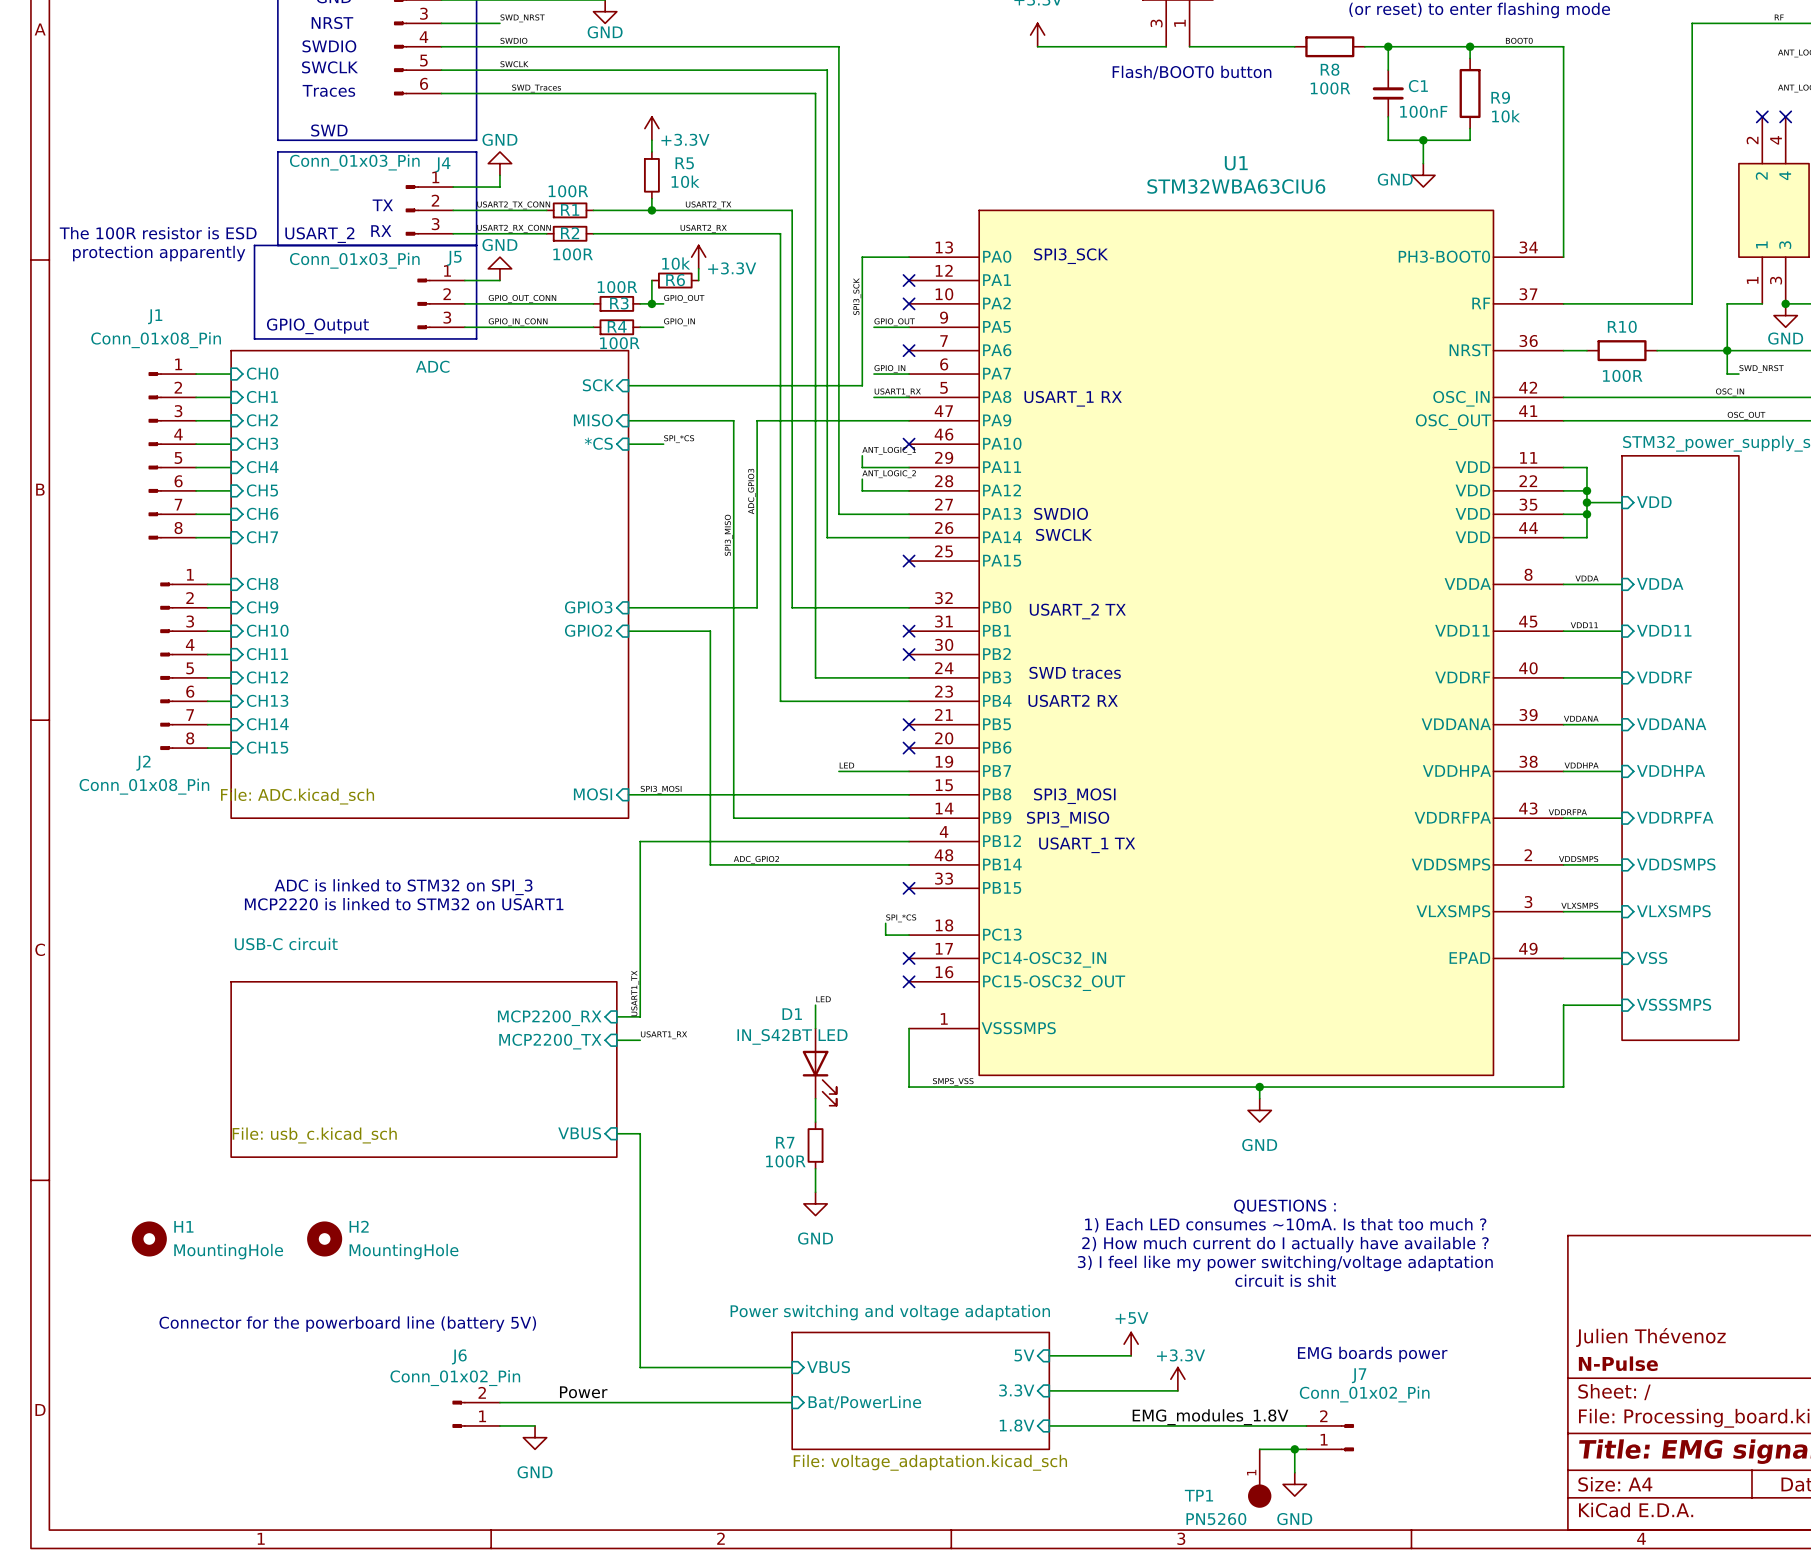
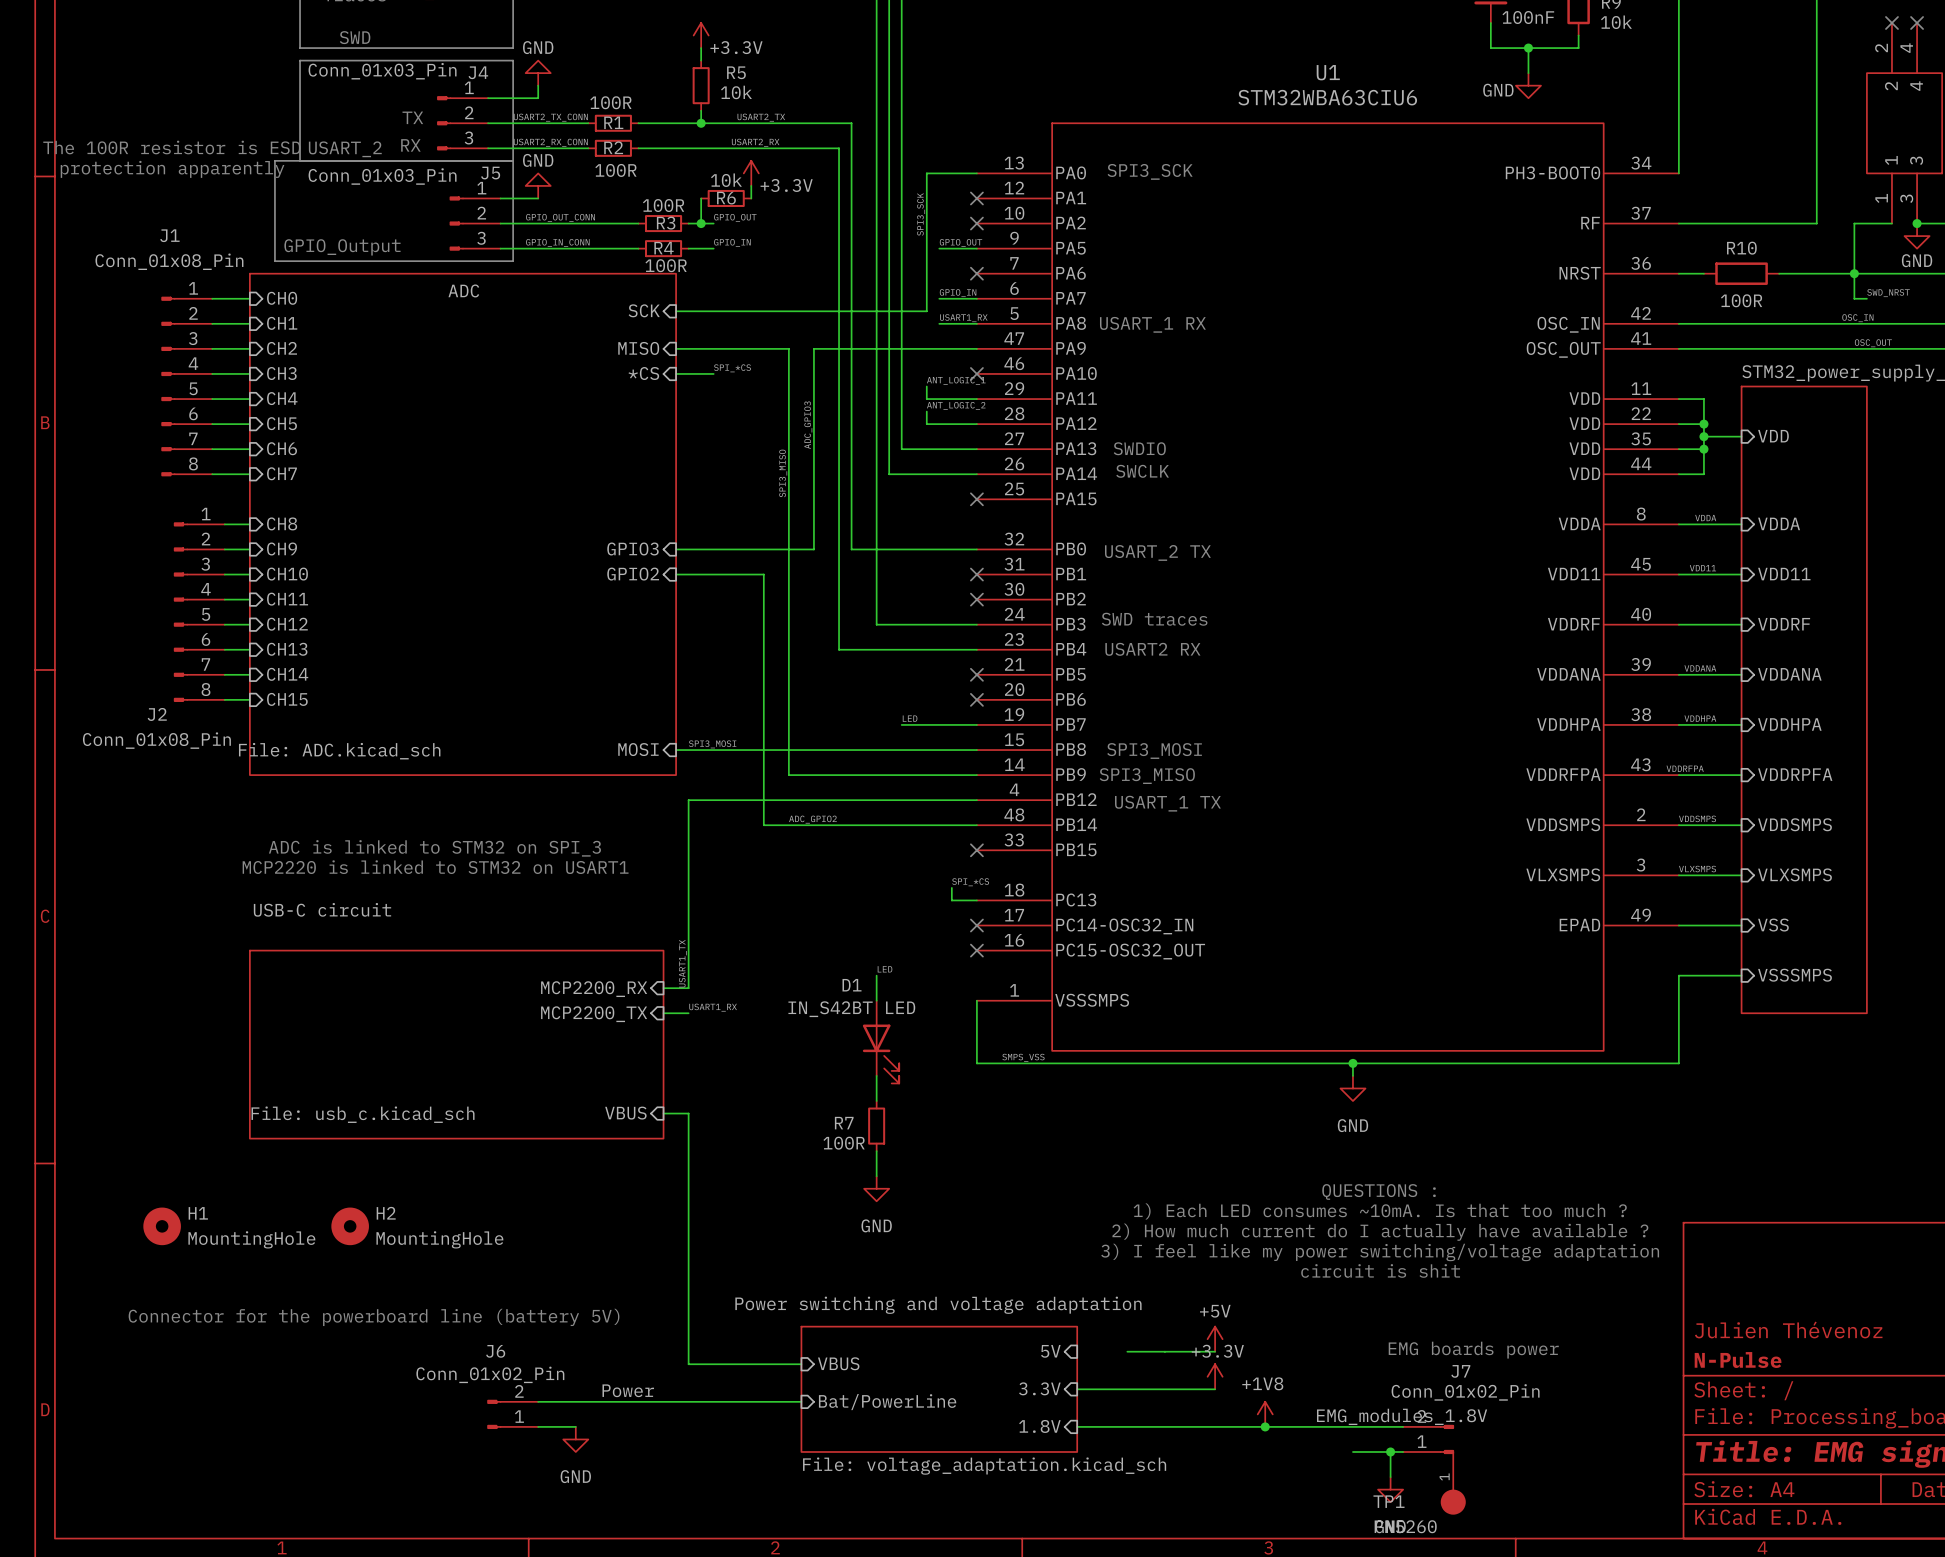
sheet pin position: 5V (1024, 1355) -> 5V (1050, 1351)
wire: (745, 1367) (792, 1367) -> none
sheet pin position: VBUS (828, 1367) -> VBUS (838, 1363)
power symbol position: +3.3V (1177, 1379) -> +3.3V (1215, 1376)
sheet Power switching and voltage adaptation position: (920, 1390) -> (939, 1389)
sheet pin position: 3.3V (1016, 1390) -> 3.3V (1039, 1388)
wire: (1131, 1390) (1177, 1390) -> (1077, 1389) (1127, 1389)
wire: (745, 1402) (792, 1402) -> none
sheet pin position: Bat/PowerLine (864, 1402) -> Bat/PowerLine (887, 1402)
power symbol: none -> +1V8 (1265, 1414)
label position: EMG_modules_1.8V (1210, 1417) -> EMG_modules_1.8V (1402, 1416)
wire: none -> (1077, 1426) (1127, 1426)
sheet pin position: 1.8V (1017, 1425) -> 1.8V (1039, 1426)
junction: none -> (1265, 1426)
TP1 position: (1259, 1478) -> (1453, 1483)

